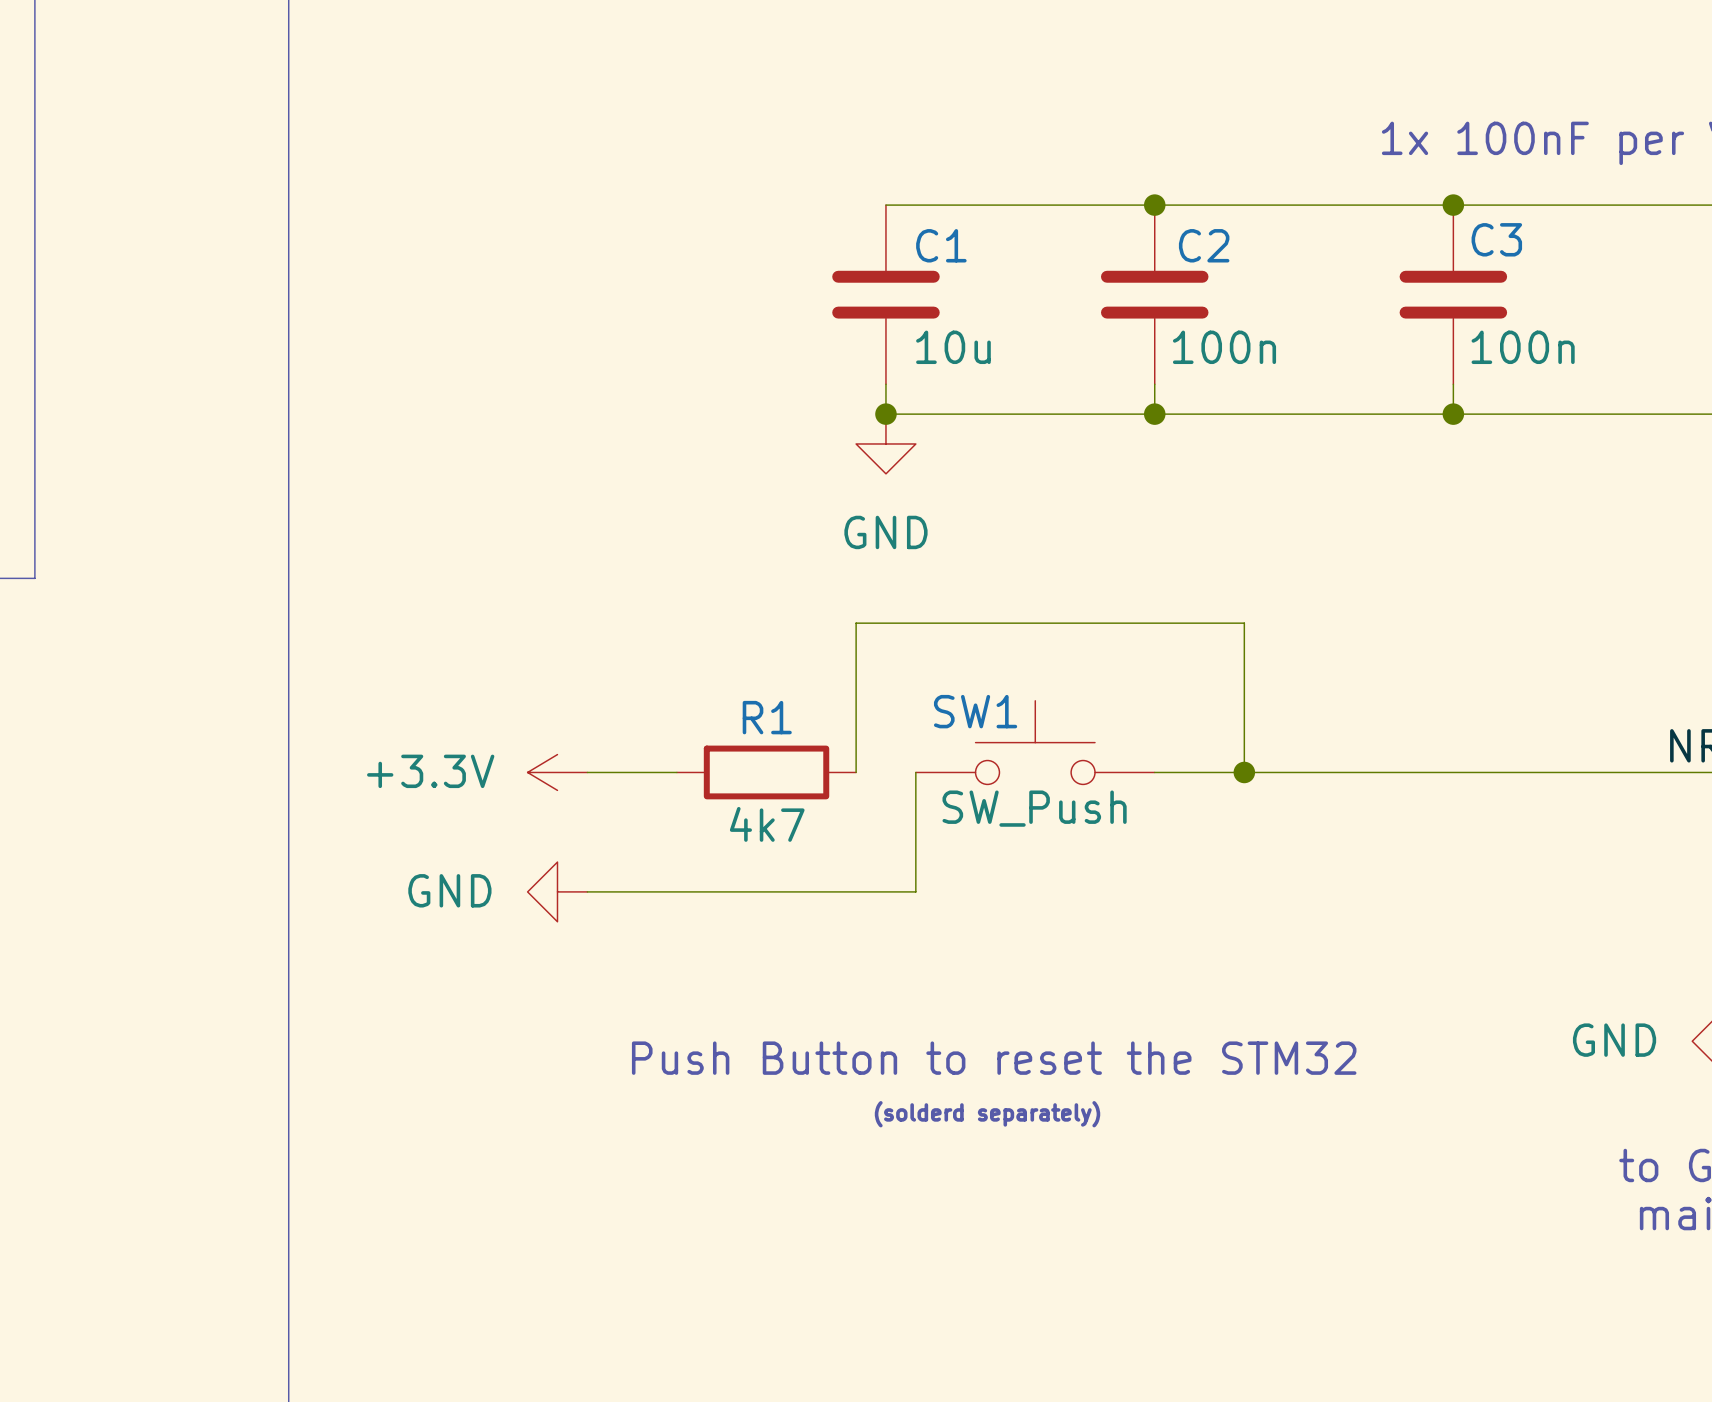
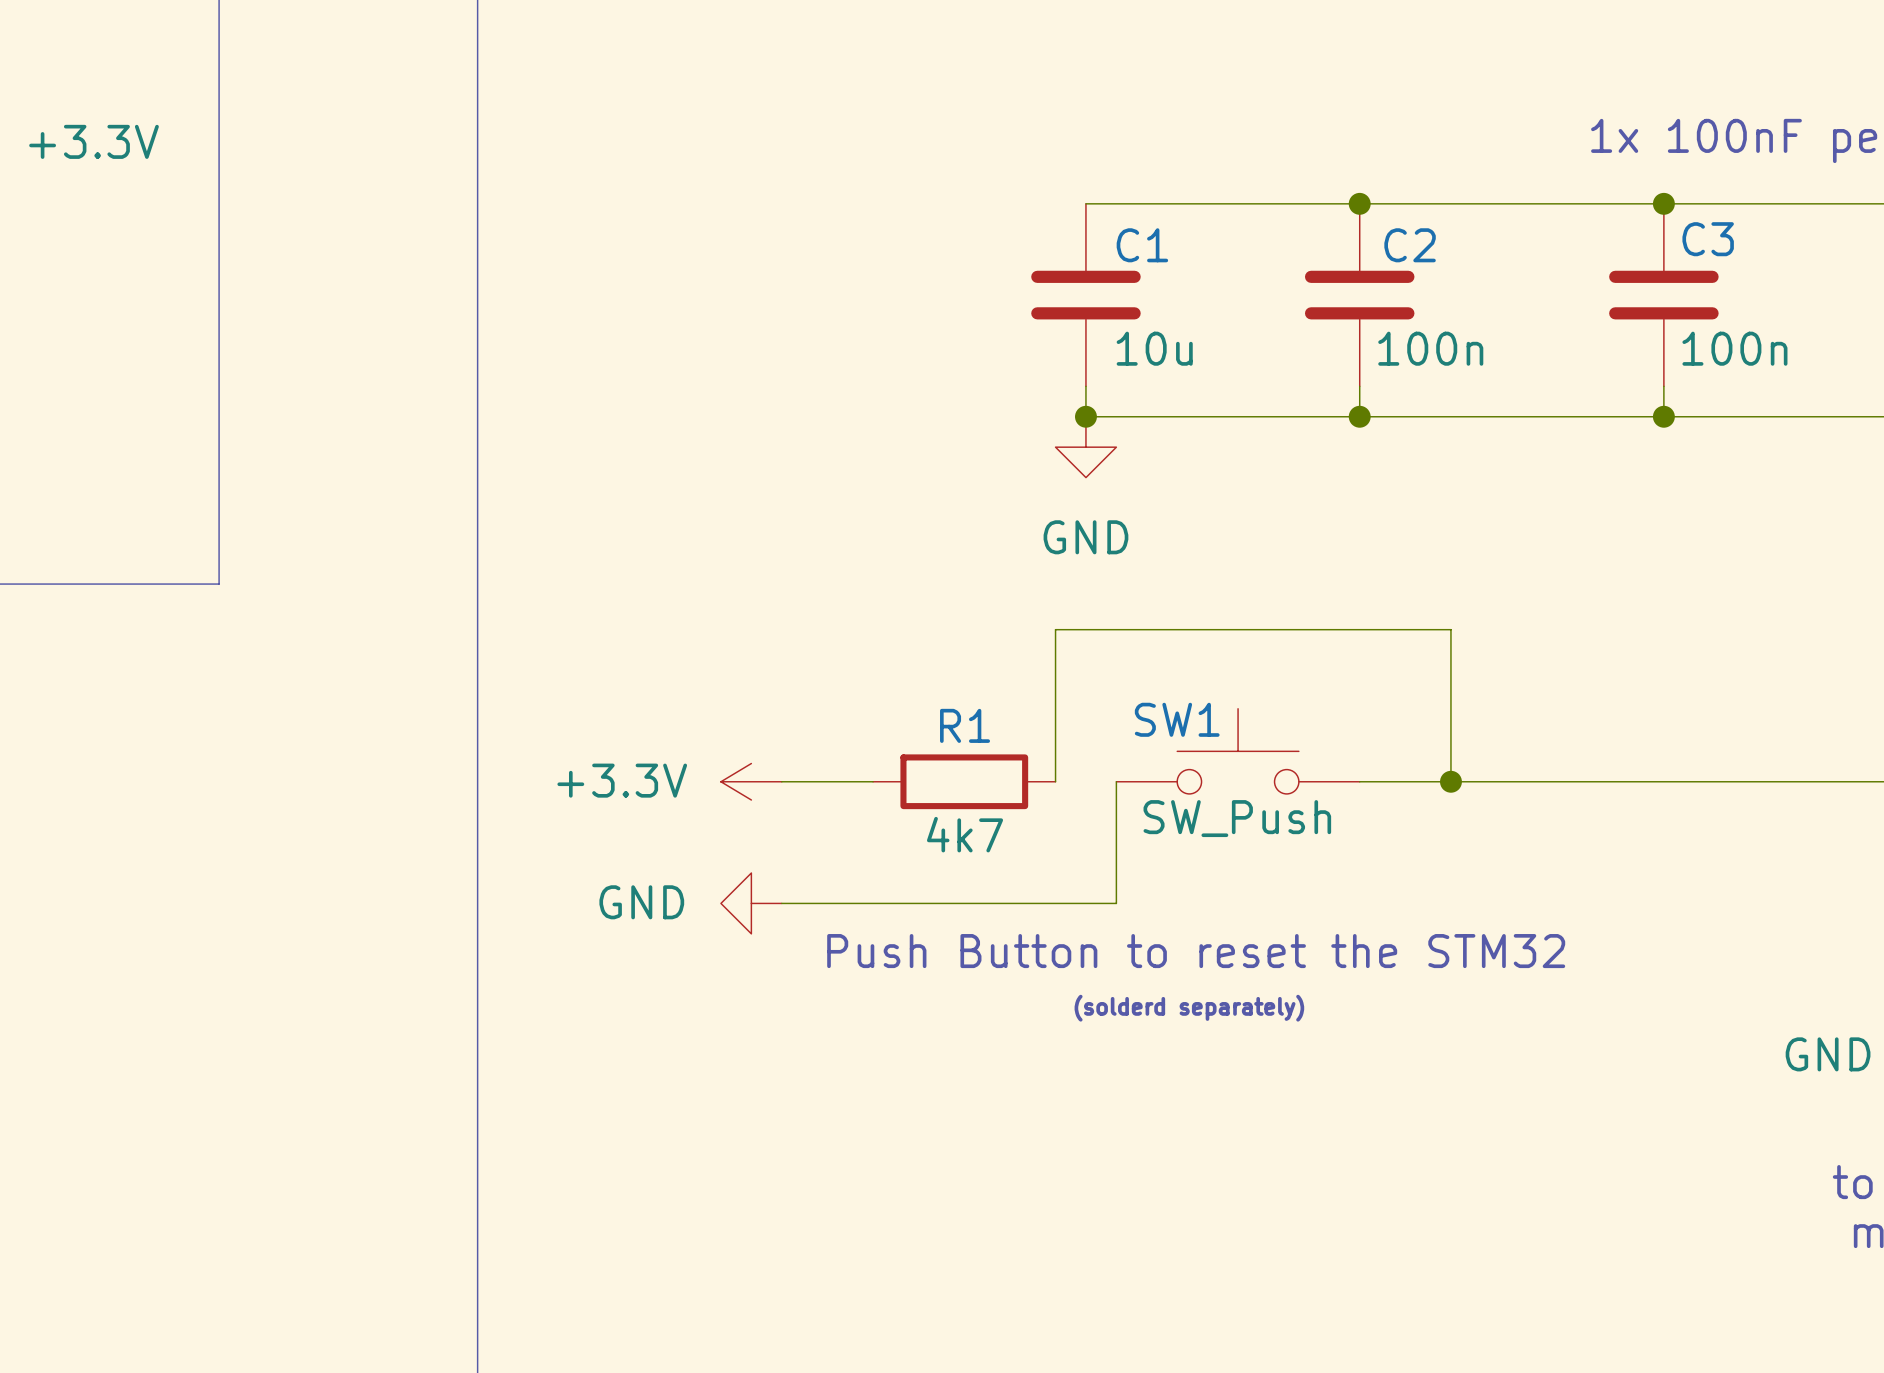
text position: Push Button to reset the STM32 (994, 1058) -> Push Button to reset the STM32 (1196, 951)
text position: (solderd separately) (987, 1114) -> (solderd separately) (1189, 1008)

